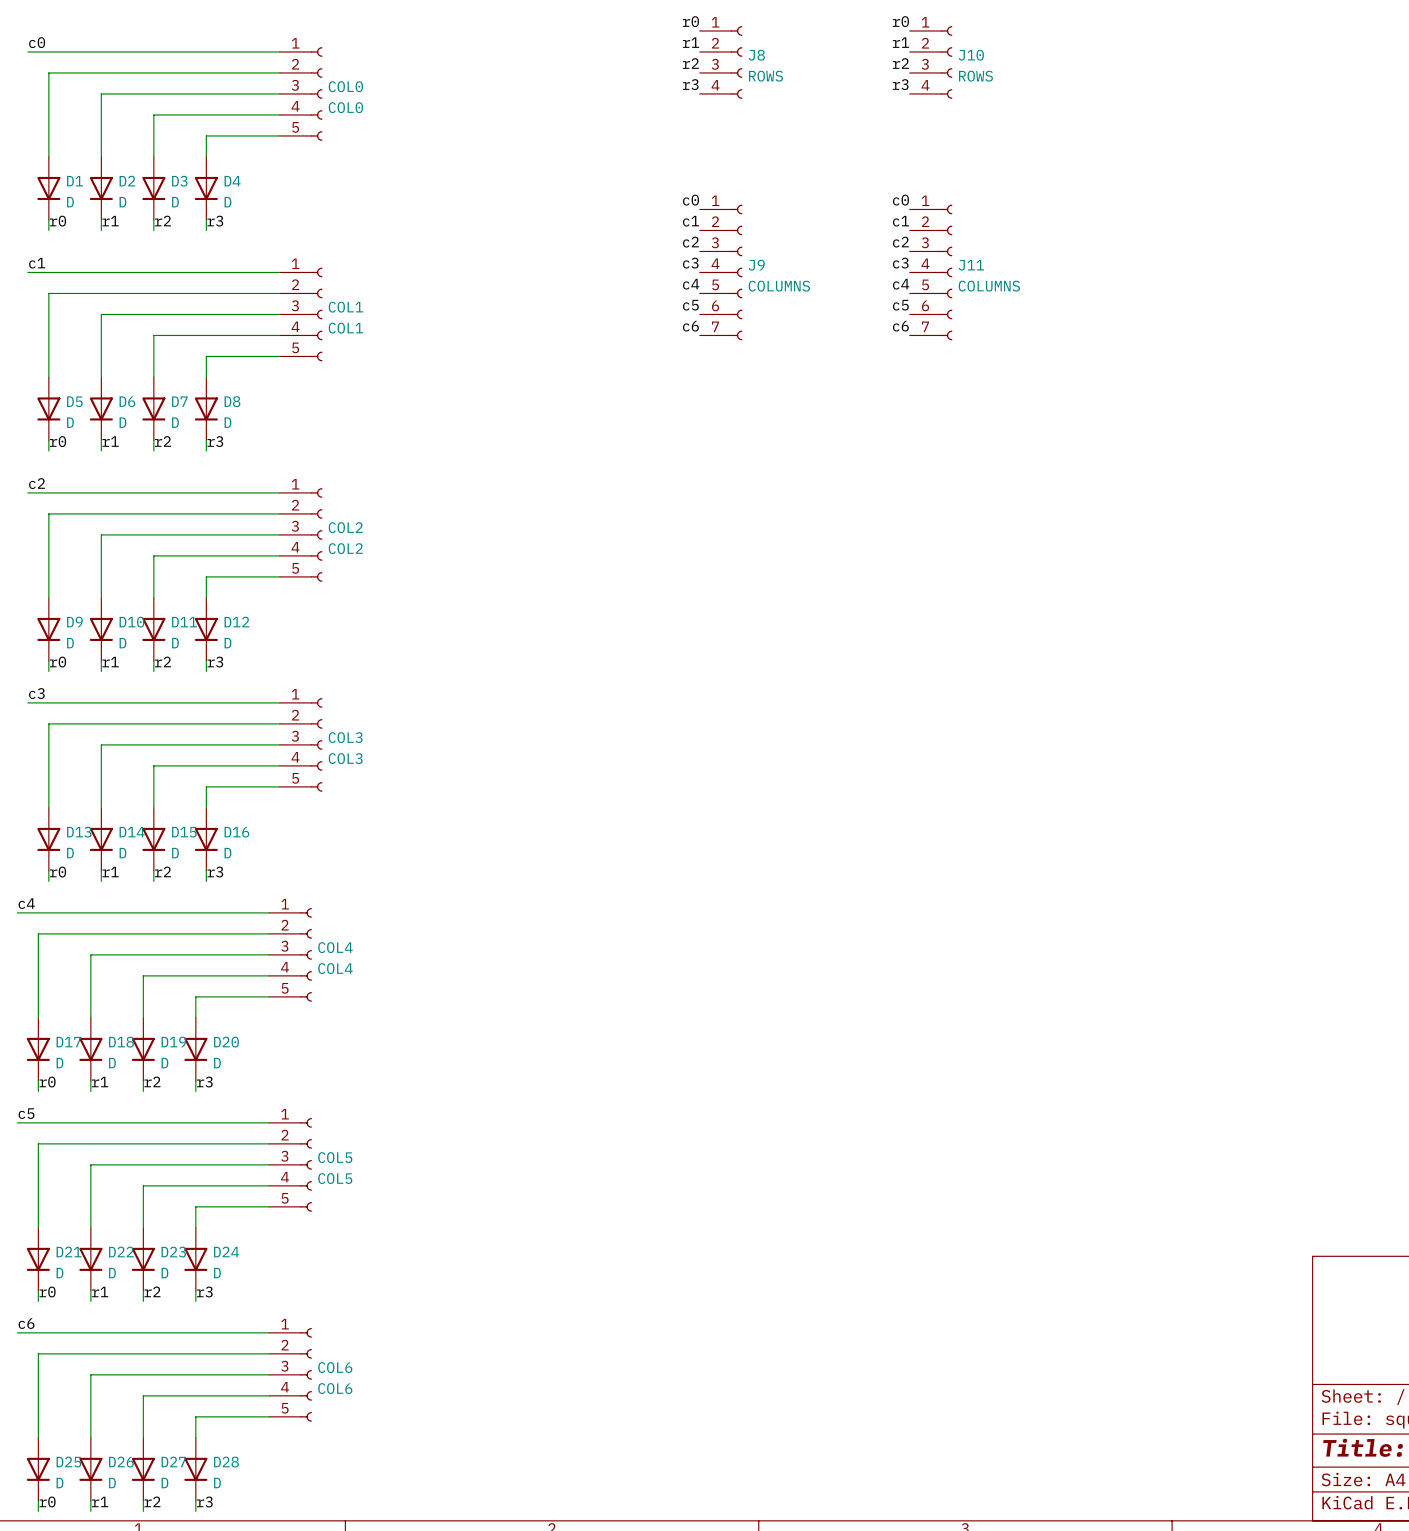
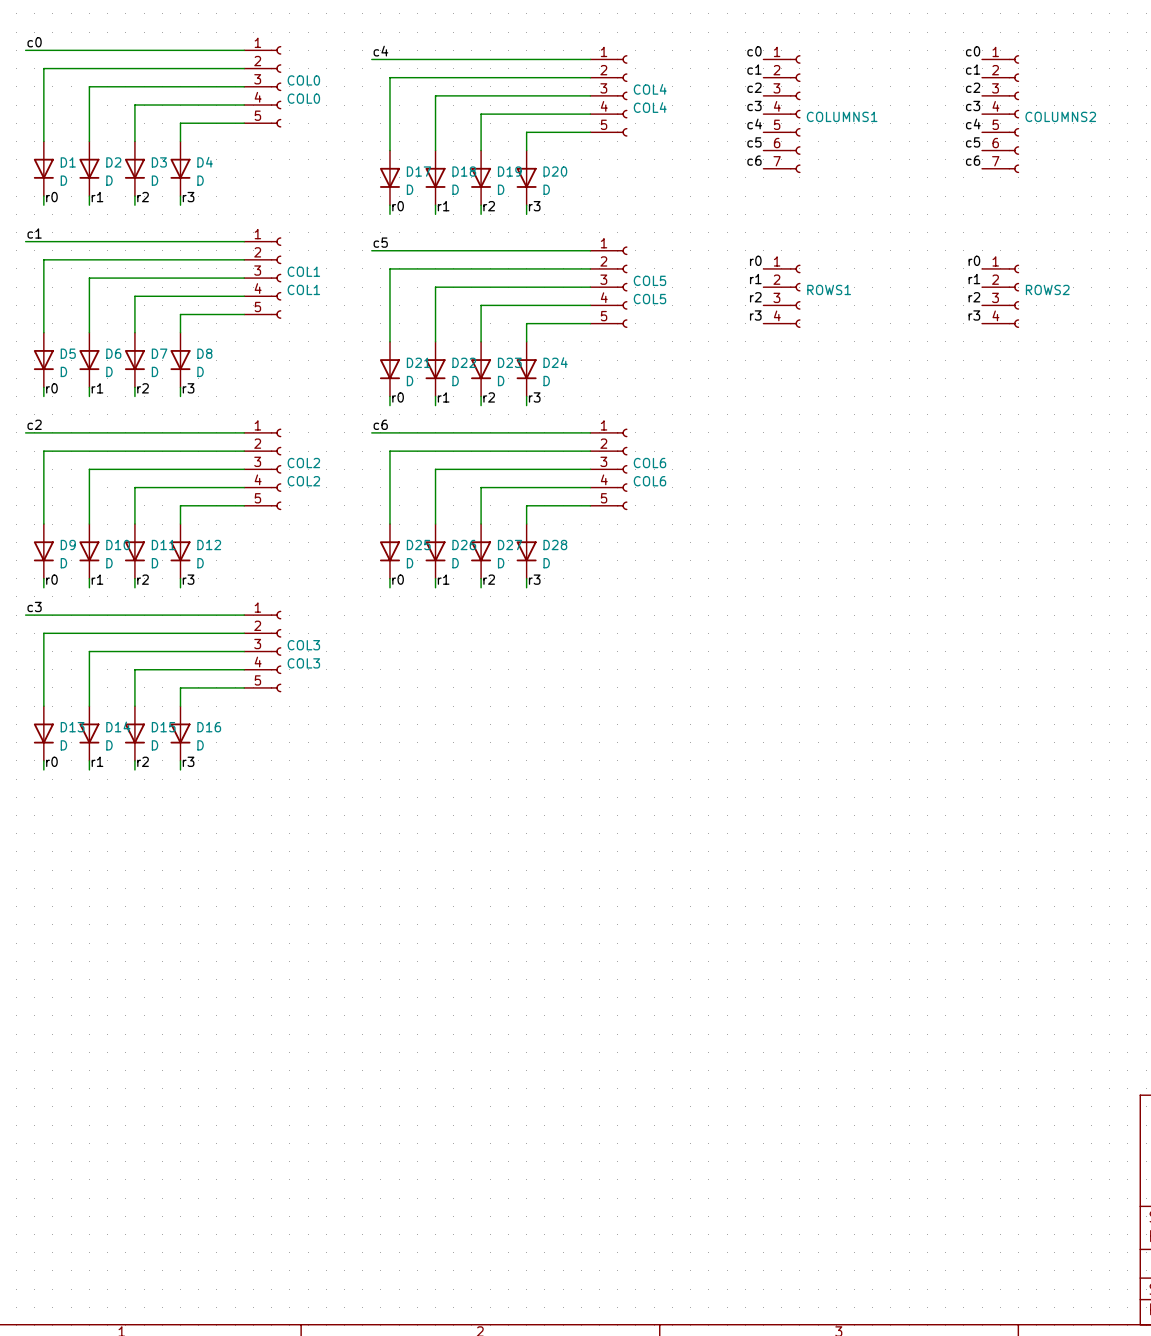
label: r0 (690, 21) -> none
label: r0 (900, 21) -> none
label: r1 (691, 42) -> none
label: r1 (900, 42) -> none
label: none -> c4 (380, 51)
label: none -> c0 (754, 51)
label: none -> c0 (973, 51)
wire: none -> (371, 59) (590, 59)
J8: ROWS (721, 62) -> none
J10: ROWS (931, 62) -> none
label: r2 (690, 63) -> none
label: r2 (900, 63) -> none
label: none -> c1 (754, 69)
label: none -> c1 (973, 69)
wire: none -> (590, 77) (389, 77) (389, 150)
label: r3 (690, 84) -> none
label: r3 (900, 84) -> none
label: none -> c2 (754, 87)
label: none -> c2 (973, 87)
wire: none -> (590, 95) (435, 95) (435, 150)
label: none -> c3 (754, 105)
label: none -> c3 (973, 105)
wire: none -> (590, 114) (481, 114) (481, 150)
COLUMNS1: none -> (781, 114)
COLUMNS2: none -> (1000, 114)
label: none -> c4 (754, 123)
label: none -> c4 (973, 123)
wire: none -> (590, 132) (526, 132) (526, 150)
label: none -> c5 (754, 142)
label: none -> c5 (973, 142)
label: none -> c6 (754, 160)
label: none -> c6 (973, 160)
label: c0 (690, 200) -> none
label: c0 (900, 200) -> none
label: c1 (691, 221) -> none
label: c1 (901, 221) -> none
wire: none -> (389, 205) (389, 214)
wire: none -> (435, 205) (435, 214)
wire: none -> (481, 205) (481, 214)
wire: none -> (526, 205) (526, 214)
label: none -> r0 (398, 206)
label: none -> r1 (443, 206)
label: none -> r2 (489, 206)
label: none -> r3 (534, 206)
label: c2 (690, 242) -> none
label: c2 (900, 242) -> none
label: c3 (690, 263) -> none
label: c3 (900, 263) -> none
J9: COLUMNS (721, 272) -> none
J11: COLUMNS (931, 272) -> none
label: none -> c5 (380, 242)
wire: none -> (371, 250) (590, 250)
label: c4 (691, 284) -> none
label: c4 (901, 284) -> none
label: none -> r0 (755, 260)
label: none -> r0 (974, 260)
wire: none -> (590, 268) (389, 268) (389, 341)
label: c5 (690, 305) -> none
label: c5 (900, 305) -> none
label: none -> r1 (755, 279)
label: none -> r1 (974, 279)
wire: none -> (590, 287) (435, 287) (435, 341)
label: c6 (690, 326) -> none
label: c6 (900, 326) -> none
ROWS1: none -> (781, 296)
ROWS2: none -> (1000, 296)
label: none -> r2 (755, 297)
label: none -> r2 (974, 297)
wire: none -> (590, 305) (481, 305) (481, 341)
label: none -> r3 (755, 315)
label: none -> r3 (974, 315)
wire: none -> (590, 323) (526, 323) (526, 341)
wire: none -> (389, 396) (389, 405)
wire: none -> (435, 396) (435, 405)
wire: none -> (481, 396) (481, 405)
wire: none -> (526, 396) (526, 405)
label: none -> r2 (489, 397)
label: none -> r0 (398, 397)
label: none -> r1 (443, 397)
label: none -> r3 (534, 397)
label: none -> c6 (380, 424)
wire: none -> (371, 432) (590, 432)
wire: none -> (590, 451) (389, 451) (389, 524)
wire: none -> (590, 469) (435, 469) (435, 524)
wire: none -> (590, 487) (481, 487) (481, 524)
wire: none -> (590, 505) (526, 505) (526, 524)
wire: none -> (389, 578) (389, 587)
wire: none -> (435, 578) (435, 587)
wire: none -> (481, 578) (481, 587)
wire: none -> (526, 578) (526, 587)
label: none -> r2 (489, 579)
label: none -> r0 (398, 579)
label: none -> r1 (443, 579)
label: none -> r3 (534, 579)
label: c4 (26, 903) -> none
wire: (17, 912) (269, 912) -> none
wire: (269, 933) (38, 933) (38, 1017) -> none
wire: (269, 954) (90, 954) (90, 1017) -> none
COL4 position: (290, 954) -> (608, 95)
wire: (269, 975) (143, 975) (143, 1017) -> none
wire: (269, 996) (195, 996) (195, 1017) -> none
D17 position: (38, 1049) -> (389, 177)
D18 position: (90, 1049) -> (435, 177)
D19 position: (143, 1049) -> (481, 177)
D20 position: (195, 1049) -> (526, 177)
wire: (38, 1080) (38, 1091) -> none
wire: (90, 1080) (90, 1091) -> none
wire: (143, 1080) (143, 1091) -> none
wire: (195, 1080) (195, 1091) -> none
label: r2 (152, 1081) -> none
label: r0 (47, 1082) -> none
label: r1 (100, 1082) -> none
label: r3 (204, 1082) -> none
label: c5 (26, 1113) -> none
wire: (17, 1122) (269, 1122) -> none
wire: (269, 1143) (38, 1143) (38, 1227) -> none
wire: (269, 1164) (90, 1164) (90, 1227) -> none
COL5 position: (290, 1164) -> (608, 287)
wire: (269, 1185) (143, 1185) (143, 1227) -> none
wire: (269, 1206) (195, 1206) (195, 1227) -> none
D21 position: (38, 1259) -> (389, 369)
D22 position: (90, 1259) -> (435, 369)
D23 position: (143, 1259) -> (481, 369)
D24 position: (195, 1259) -> (526, 369)
wire: (38, 1290) (38, 1301) -> none
wire: (90, 1290) (90, 1301) -> none
wire: (143, 1290) (143, 1301) -> none
wire: (195, 1290) (195, 1301) -> none
label: r2 (152, 1291) -> none
label: r0 (47, 1292) -> none
label: r1 (100, 1292) -> none
label: r3 (204, 1292) -> none
label: c6 (26, 1323) -> none
wire: (17, 1332) (269, 1332) -> none
wire: (269, 1353) (38, 1353) (38, 1437) -> none
wire: (269, 1374) (90, 1374) (90, 1437) -> none
COL6 position: (290, 1374) -> (608, 469)
wire: (269, 1395) (143, 1395) (143, 1437) -> none
wire: (269, 1416) (195, 1416) (195, 1437) -> none
D25 position: (38, 1469) -> (389, 551)
D26 position: (90, 1469) -> (435, 551)
D27 position: (143, 1469) -> (481, 551)
D28 position: (195, 1469) -> (526, 551)
wire: (38, 1500) (38, 1511) -> none
wire: (90, 1500) (90, 1511) -> none
wire: (143, 1500) (143, 1511) -> none
wire: (195, 1500) (195, 1511) -> none
label: r0 (47, 1501) -> none
label: r1 (100, 1501) -> none
label: r2 (152, 1501) -> none
label: r3 (204, 1501) -> none

